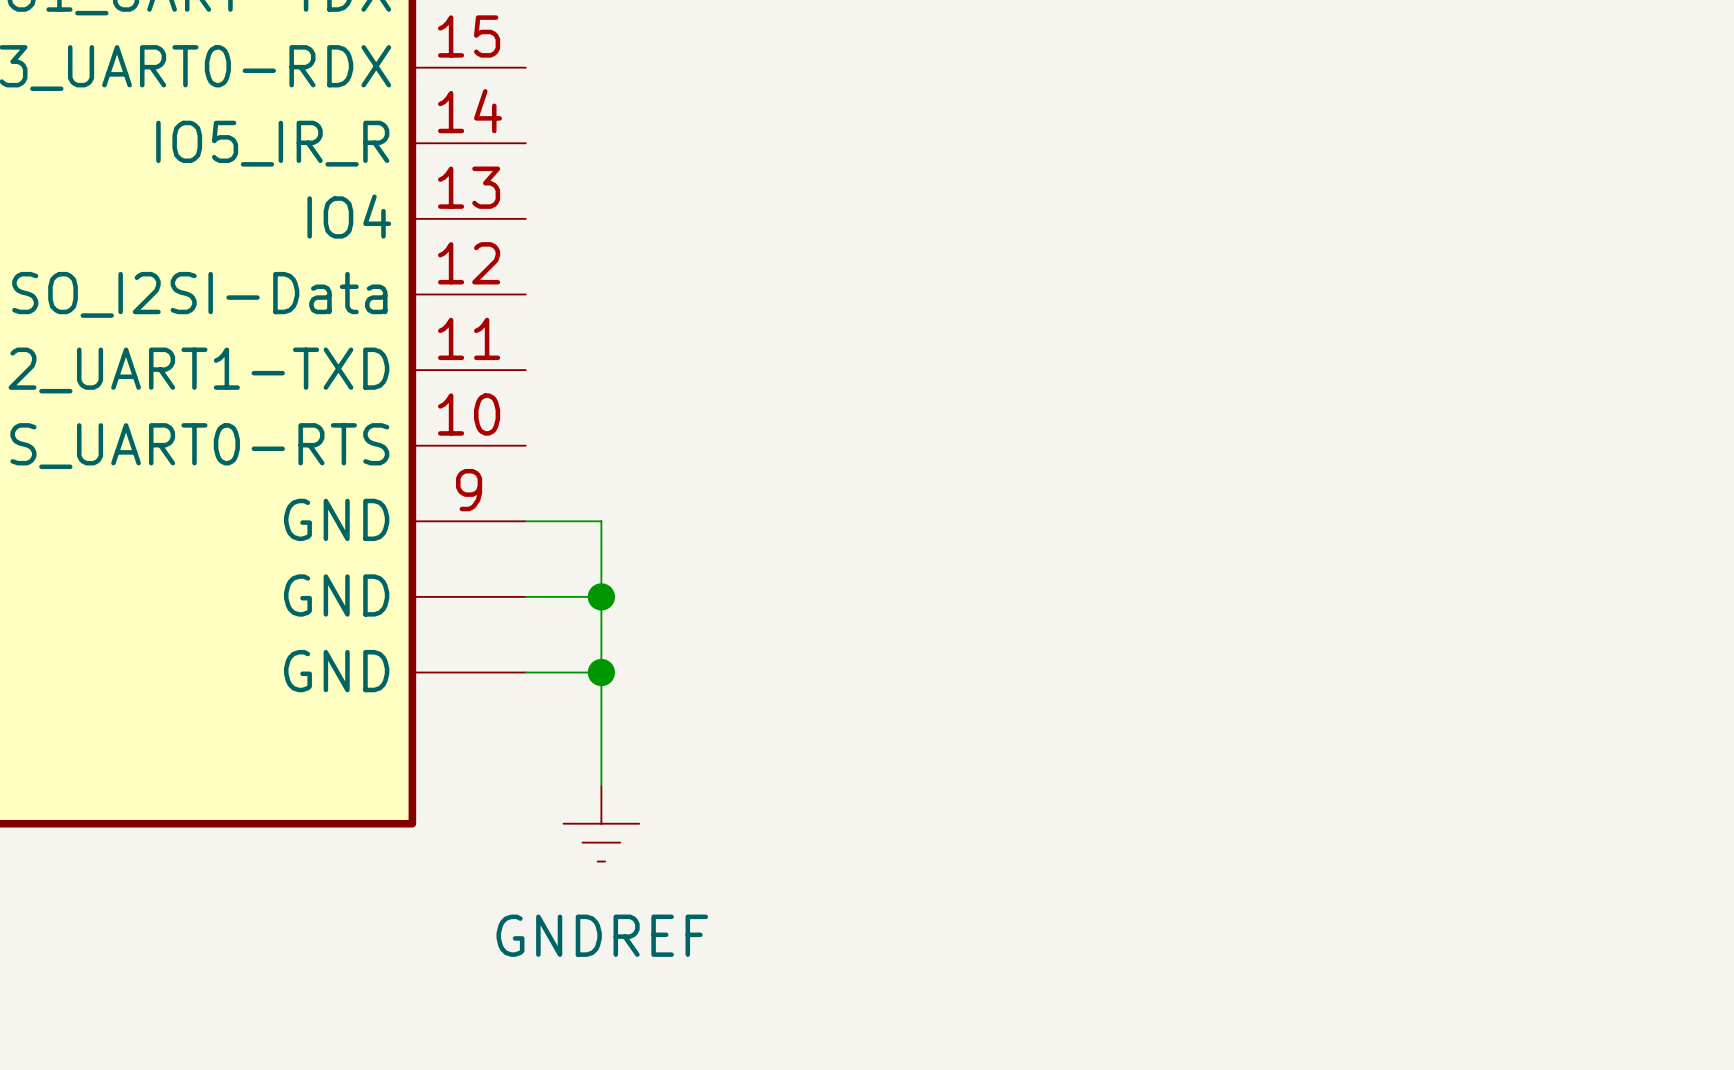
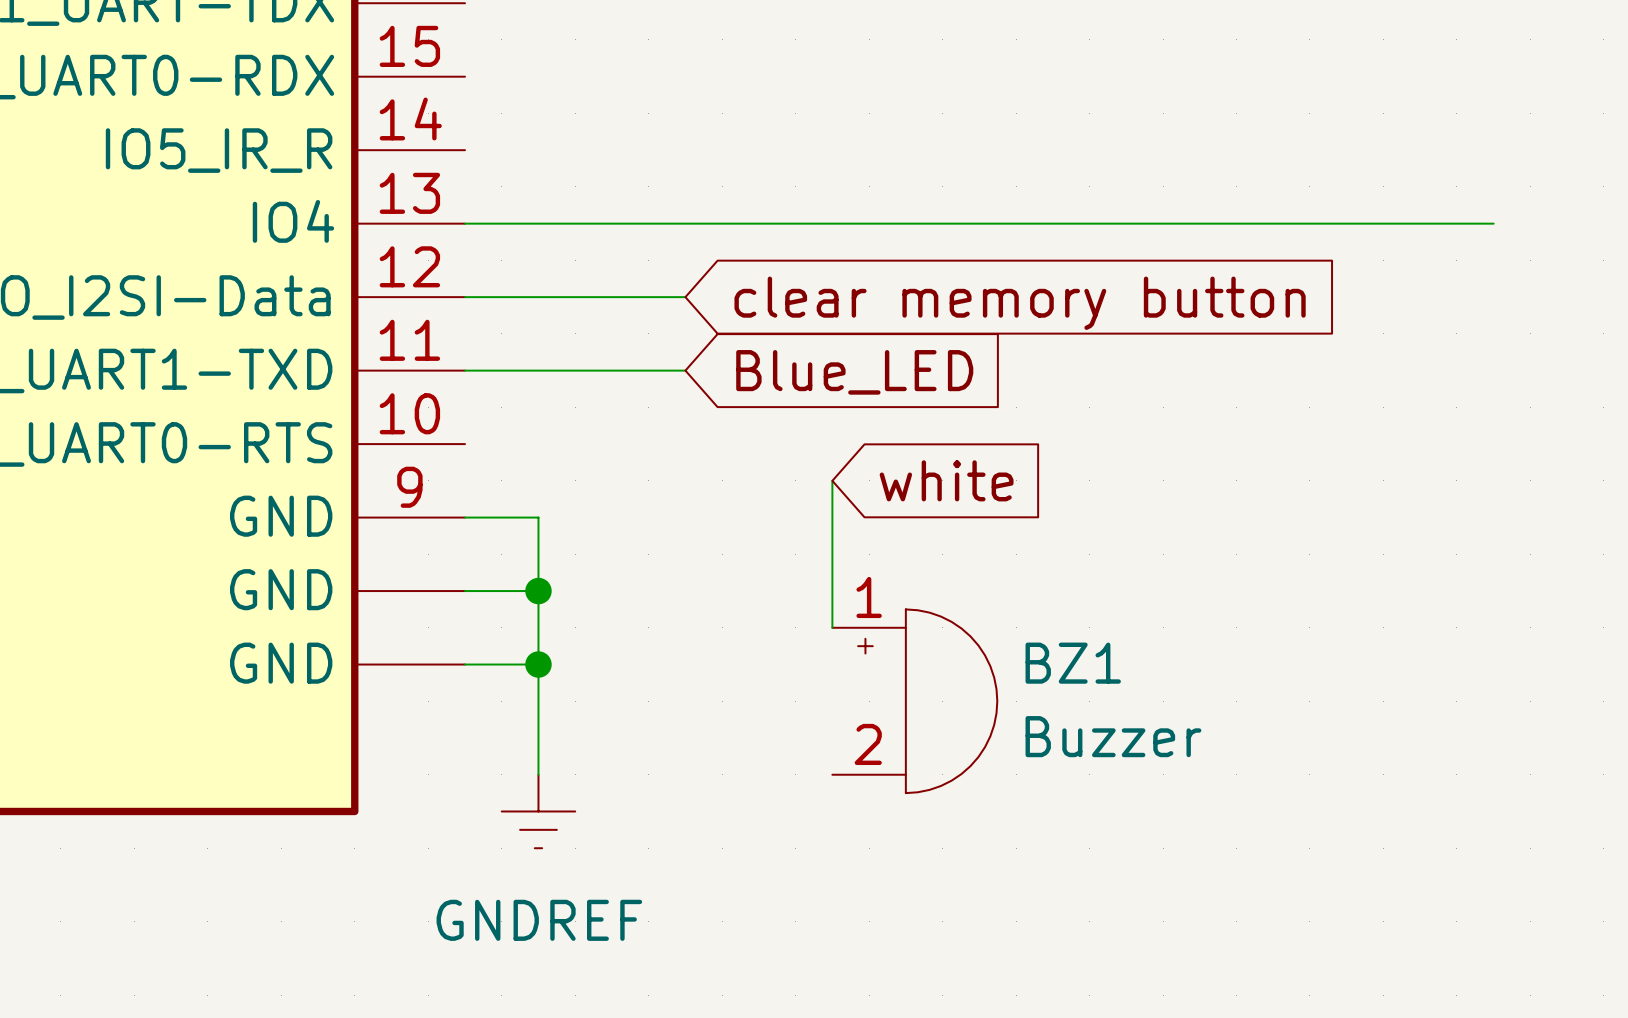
wire: none -> (464, 223) (1493, 223)
wire: none -> (464, 297) (685, 297)
global label: none -> clear memory button (1020, 303)
wire: none -> (464, 370) (685, 370)
global label: none -> Blue_LED (854, 372)
wire: none -> (832, 480) (832, 627)
global label: none -> white (946, 480)
BZ1: none -> Buzzer (914, 701)

